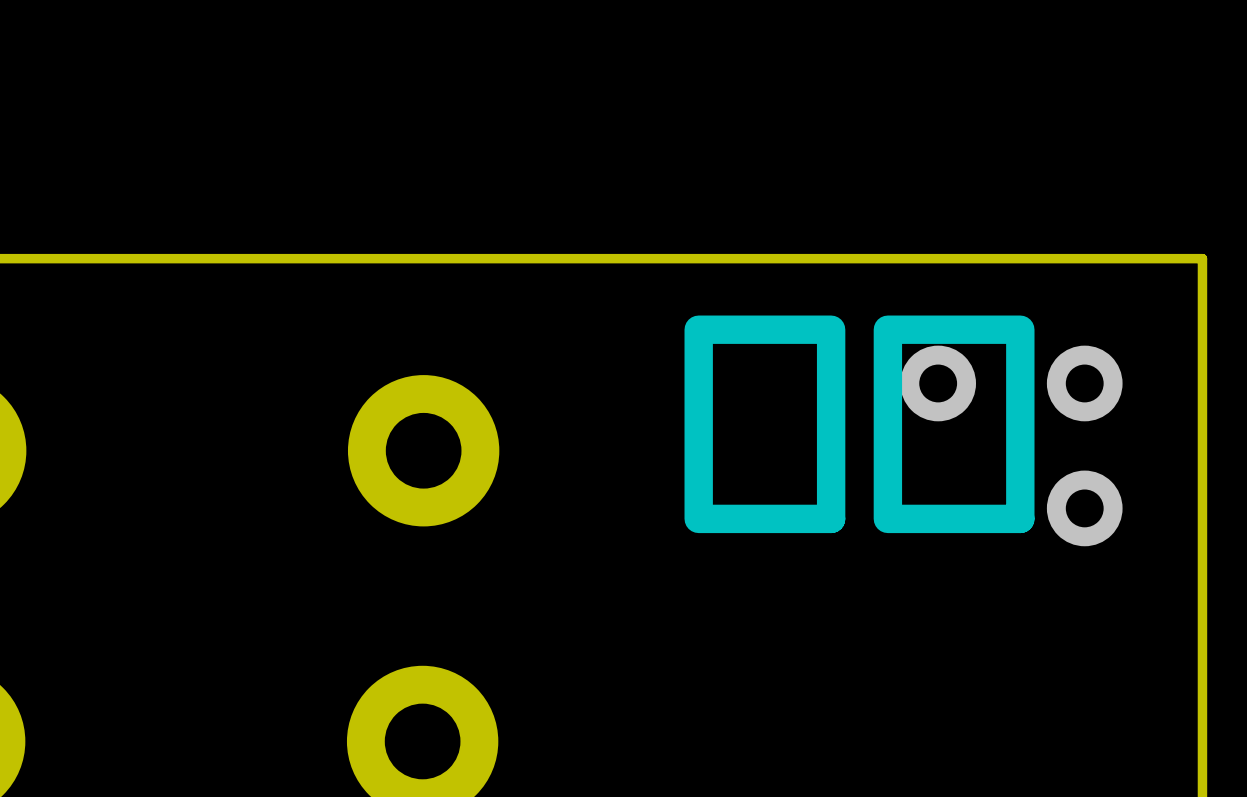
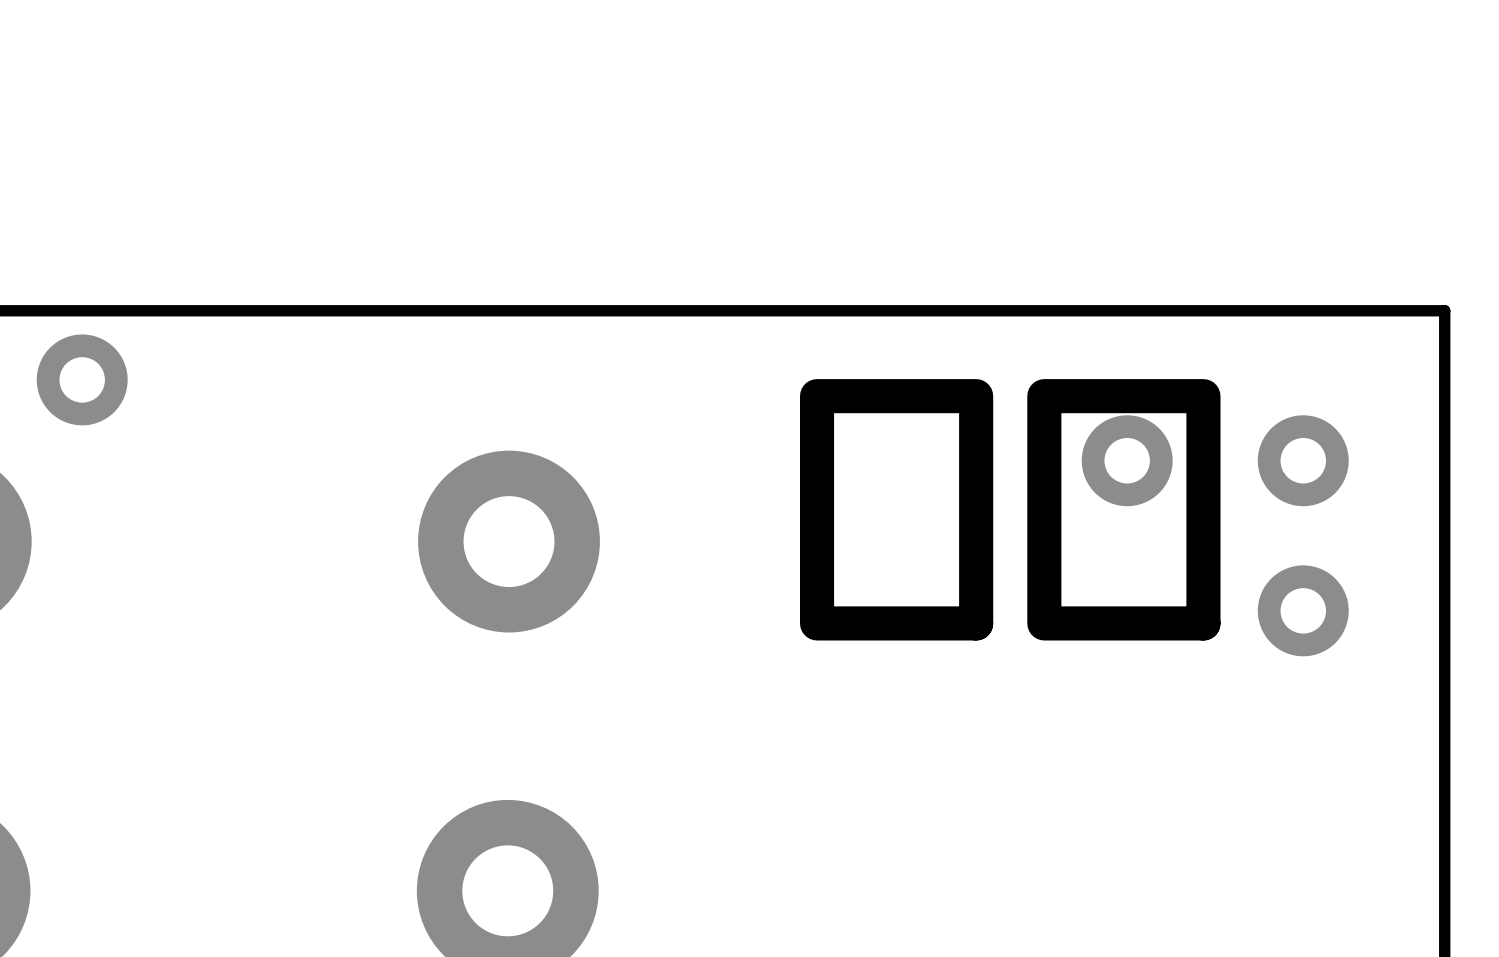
via: none -> (82, 379)

